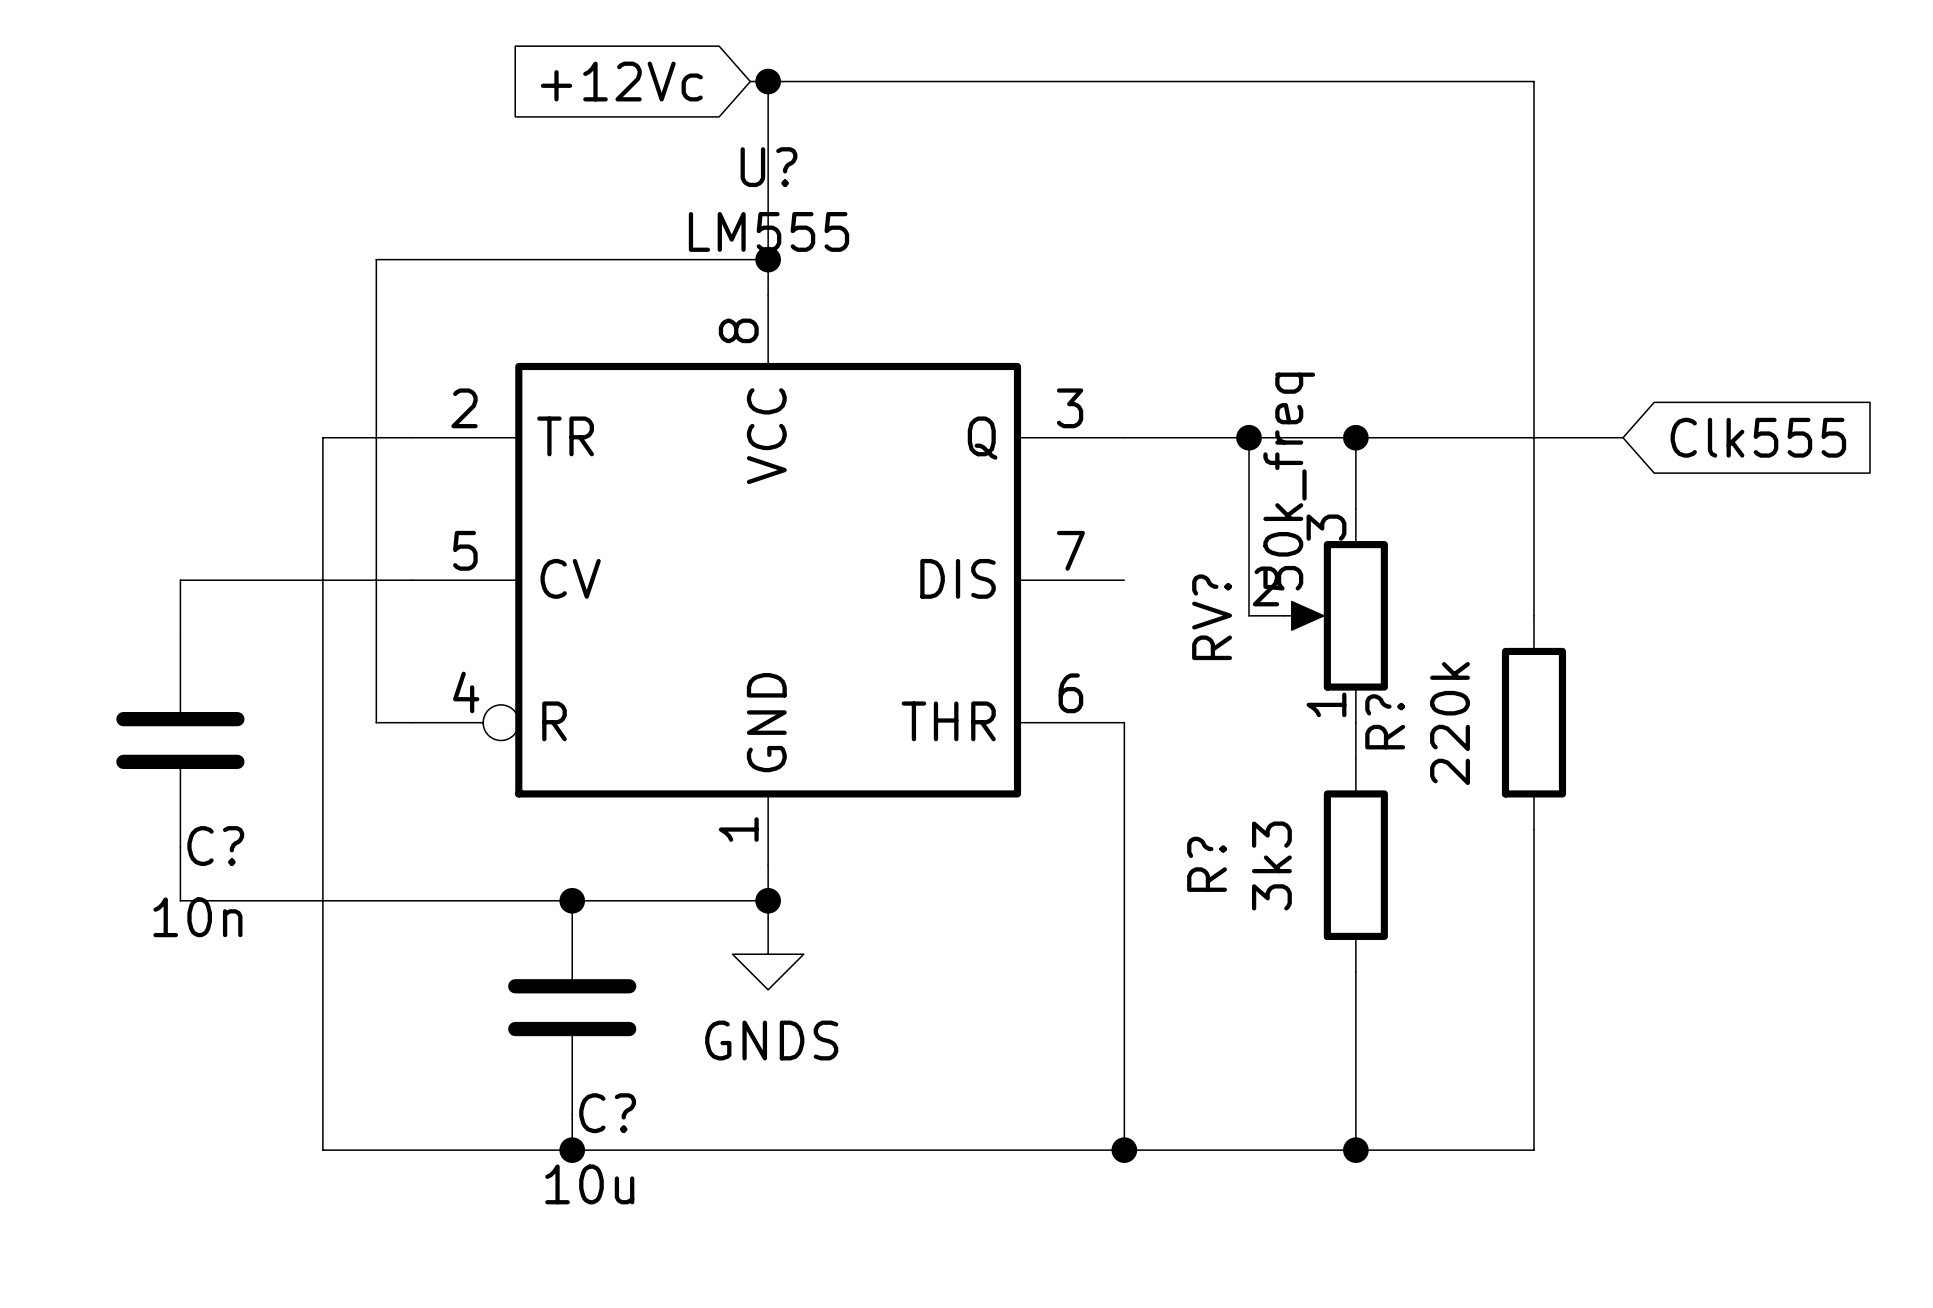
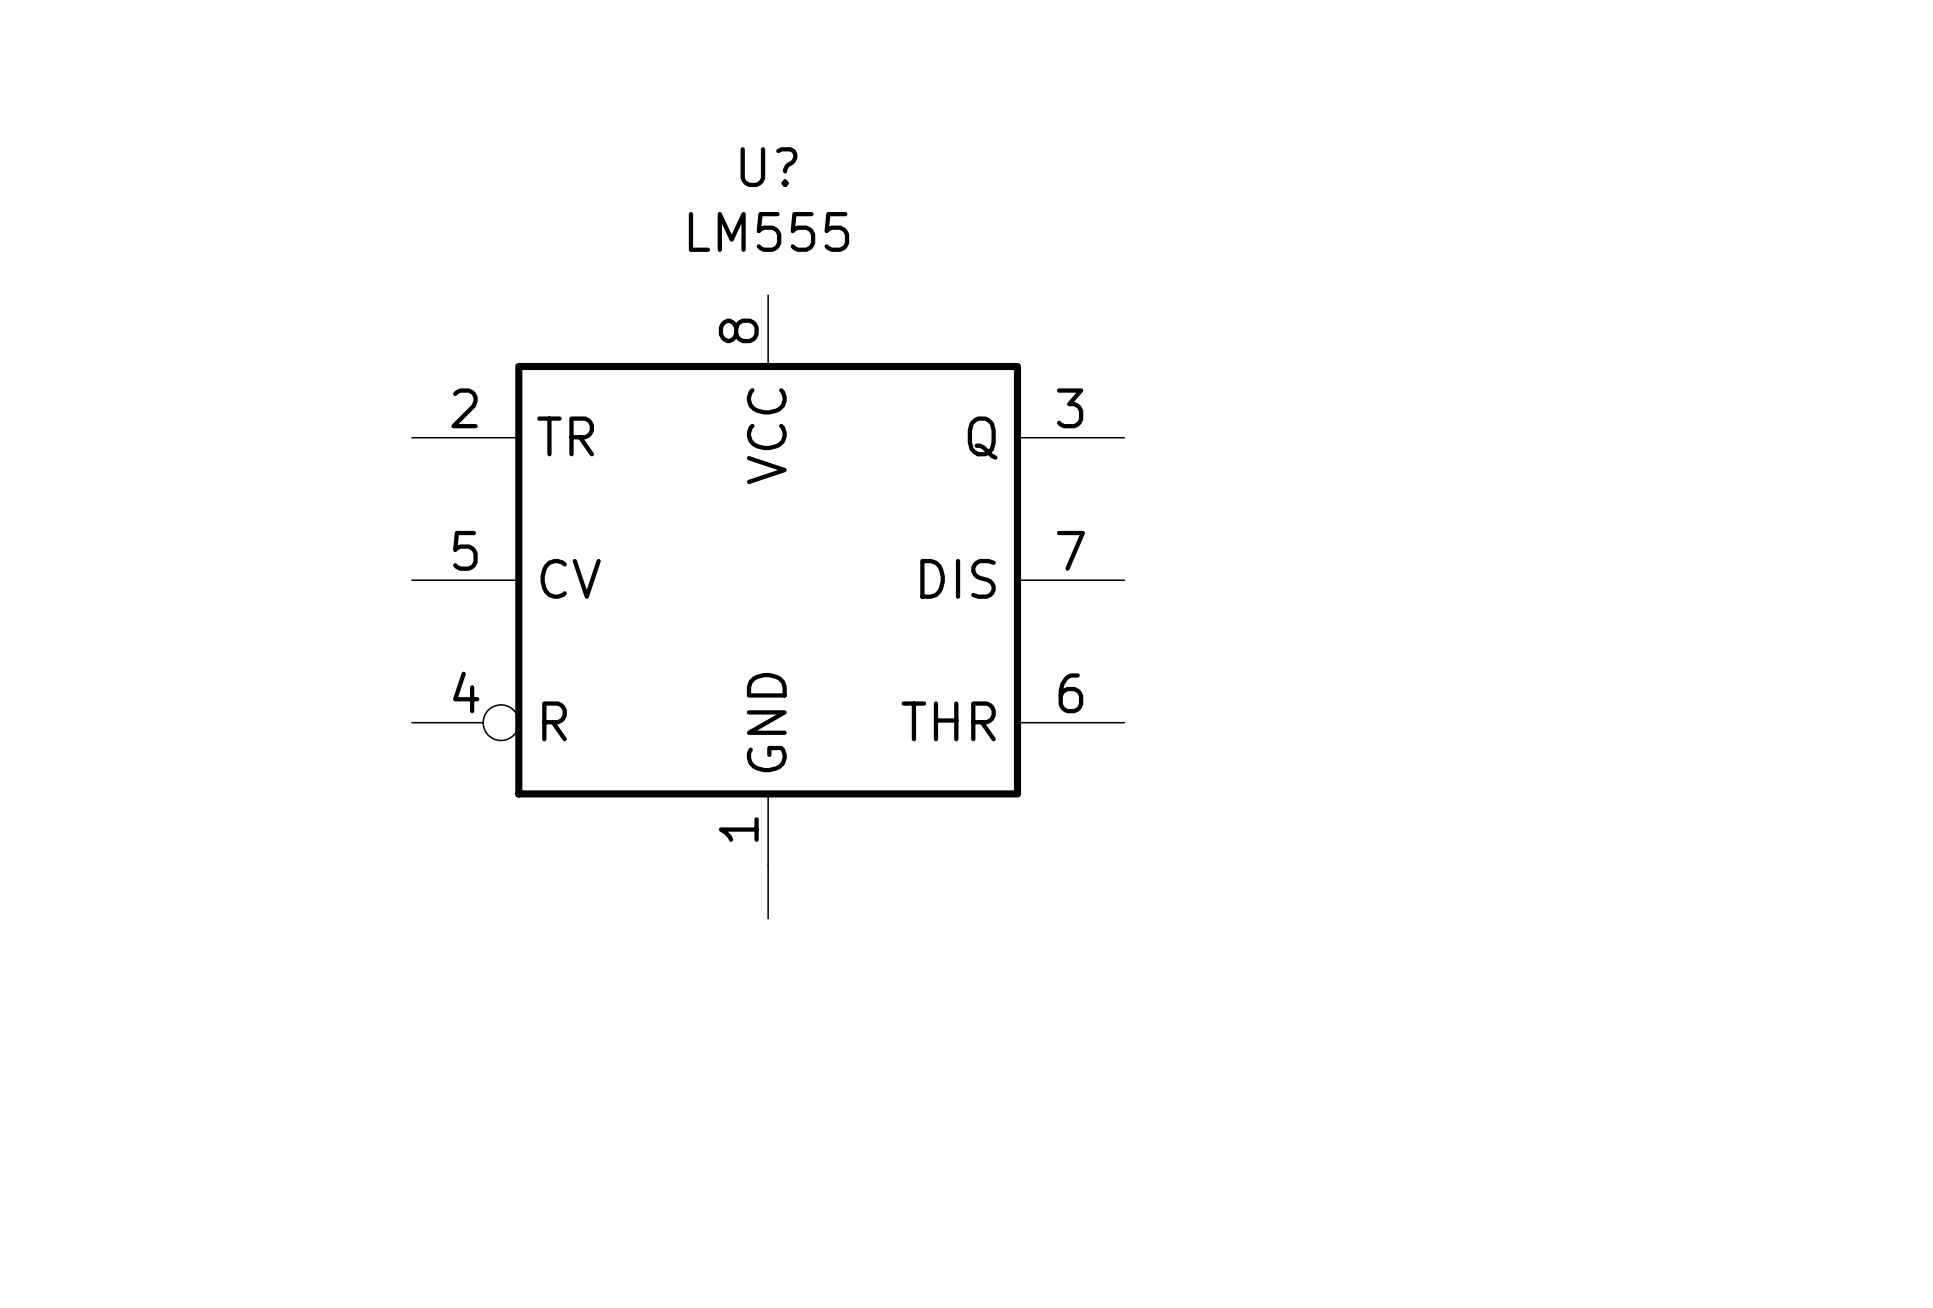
global label: +12Vc (621, 81) -> none
wire: (750, 81) (1533, 81) (1533, 615) -> none
wire: (768, 81) (768, 295) -> none
junction: (768, 81) -> none
wire: (768, 259) (376, 259) (376, 722) (411, 722) -> none
junction: (768, 259) -> none
wire: (411, 437) (322, 437) (322, 1150) (1533, 1150) (1533, 829) -> none
wire: (1124, 437) (1623, 437) -> none
wire: (1249, 437) (1249, 615) -> none
junction: (1249, 437) -> none
wire: (1355, 437) (1355, 508) -> none
junction: (1355, 437) -> none
global label: Clk555 (1758, 437) -> none
wire: (411, 580) (180, 580) (180, 633) -> none
RV?: 50k_freq (1318, 615) -> none
wire: (1124, 722) (1124, 1150) -> none
wire: (1355, 722) (1355, 758) -> none
R?: 220k (1533, 722) -> none
C?: 10n (180, 740) -> none
wire: (180, 847) (180, 900) (768, 900) -> none
R?: 3k3 (1355, 865) -> none
junction: (572, 900) -> none
junction: (768, 900) -> none
power symbol: GNDS (768, 954) -> none
wire: (1355, 972) (1355, 1150) -> none
C?: 10u (572, 1007) -> none
wire: (572, 1114) (572, 1150) -> none
junction: (572, 1150) -> none
junction: (1124, 1150) -> none
junction: (1355, 1150) -> none

